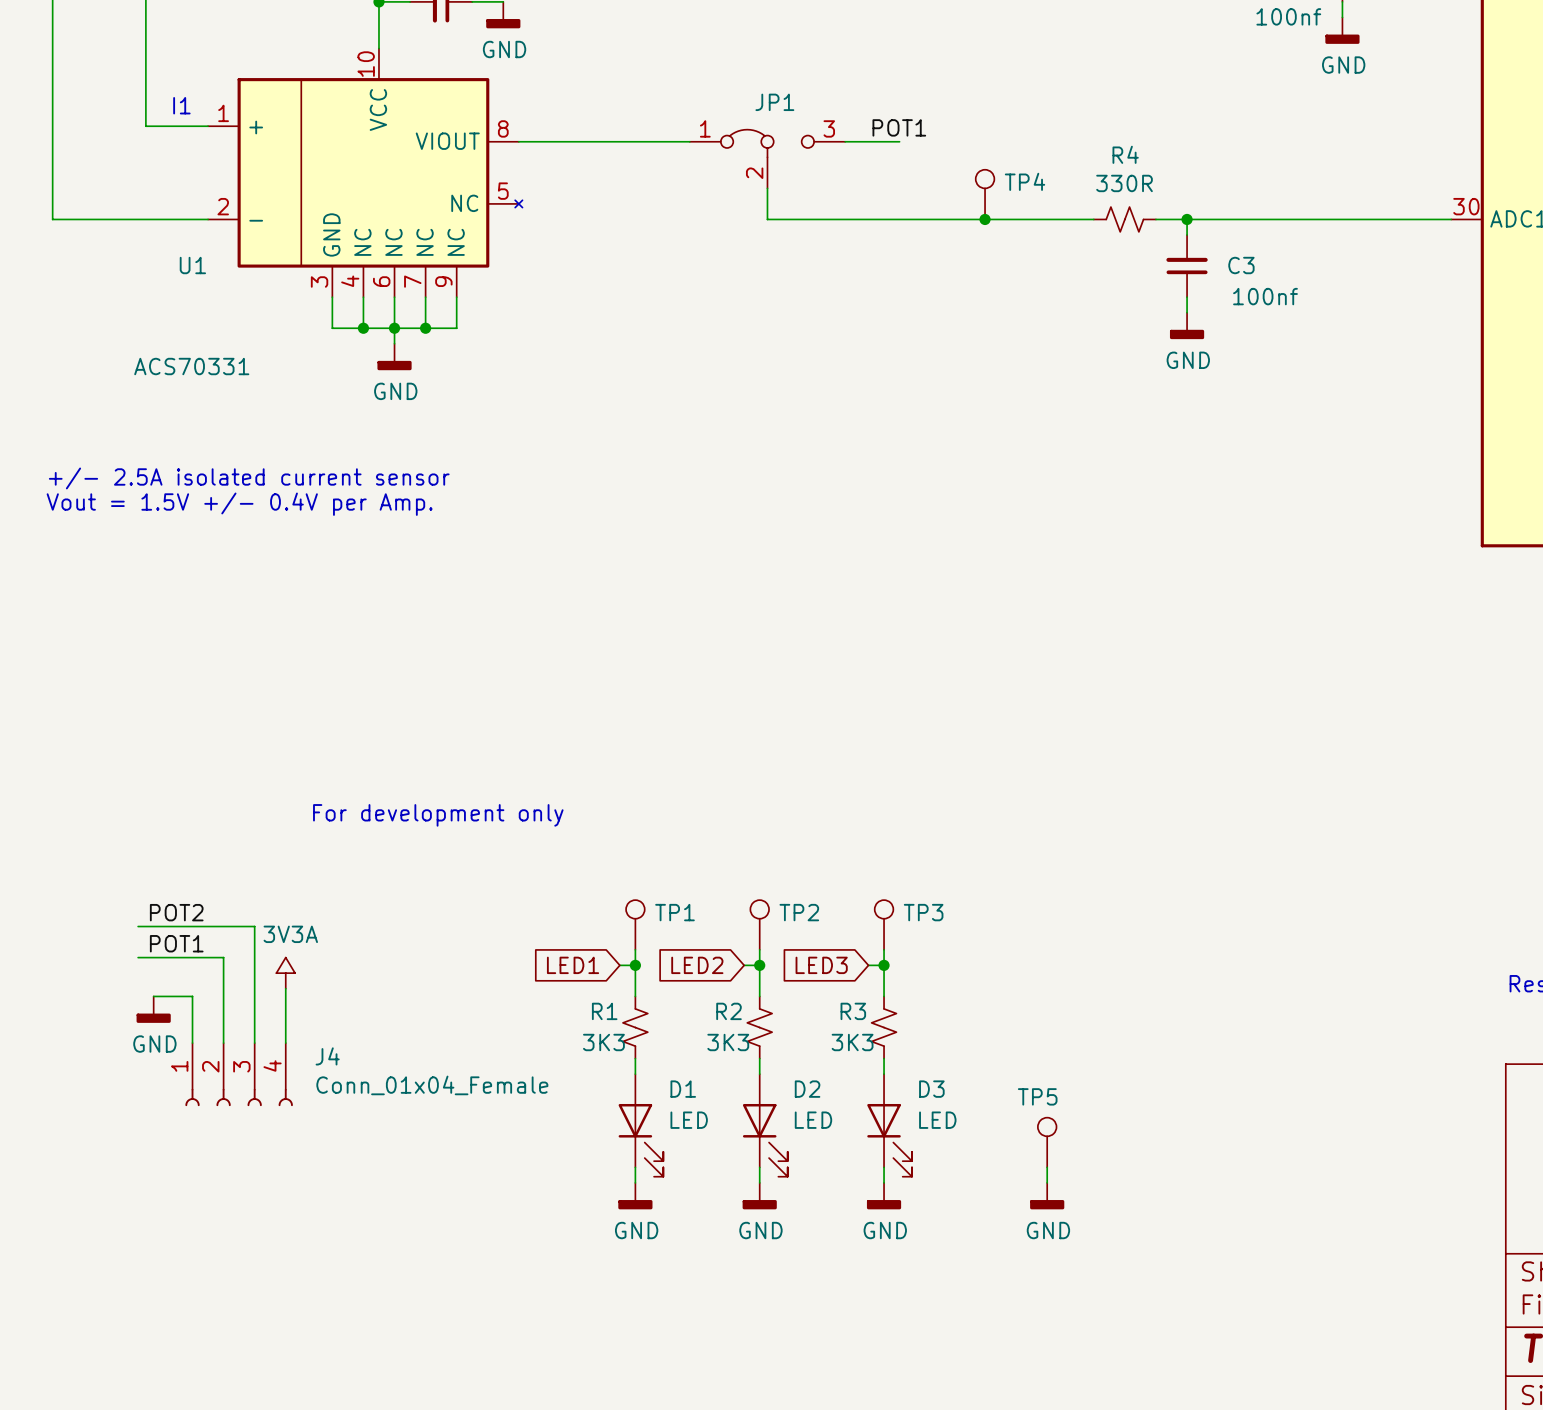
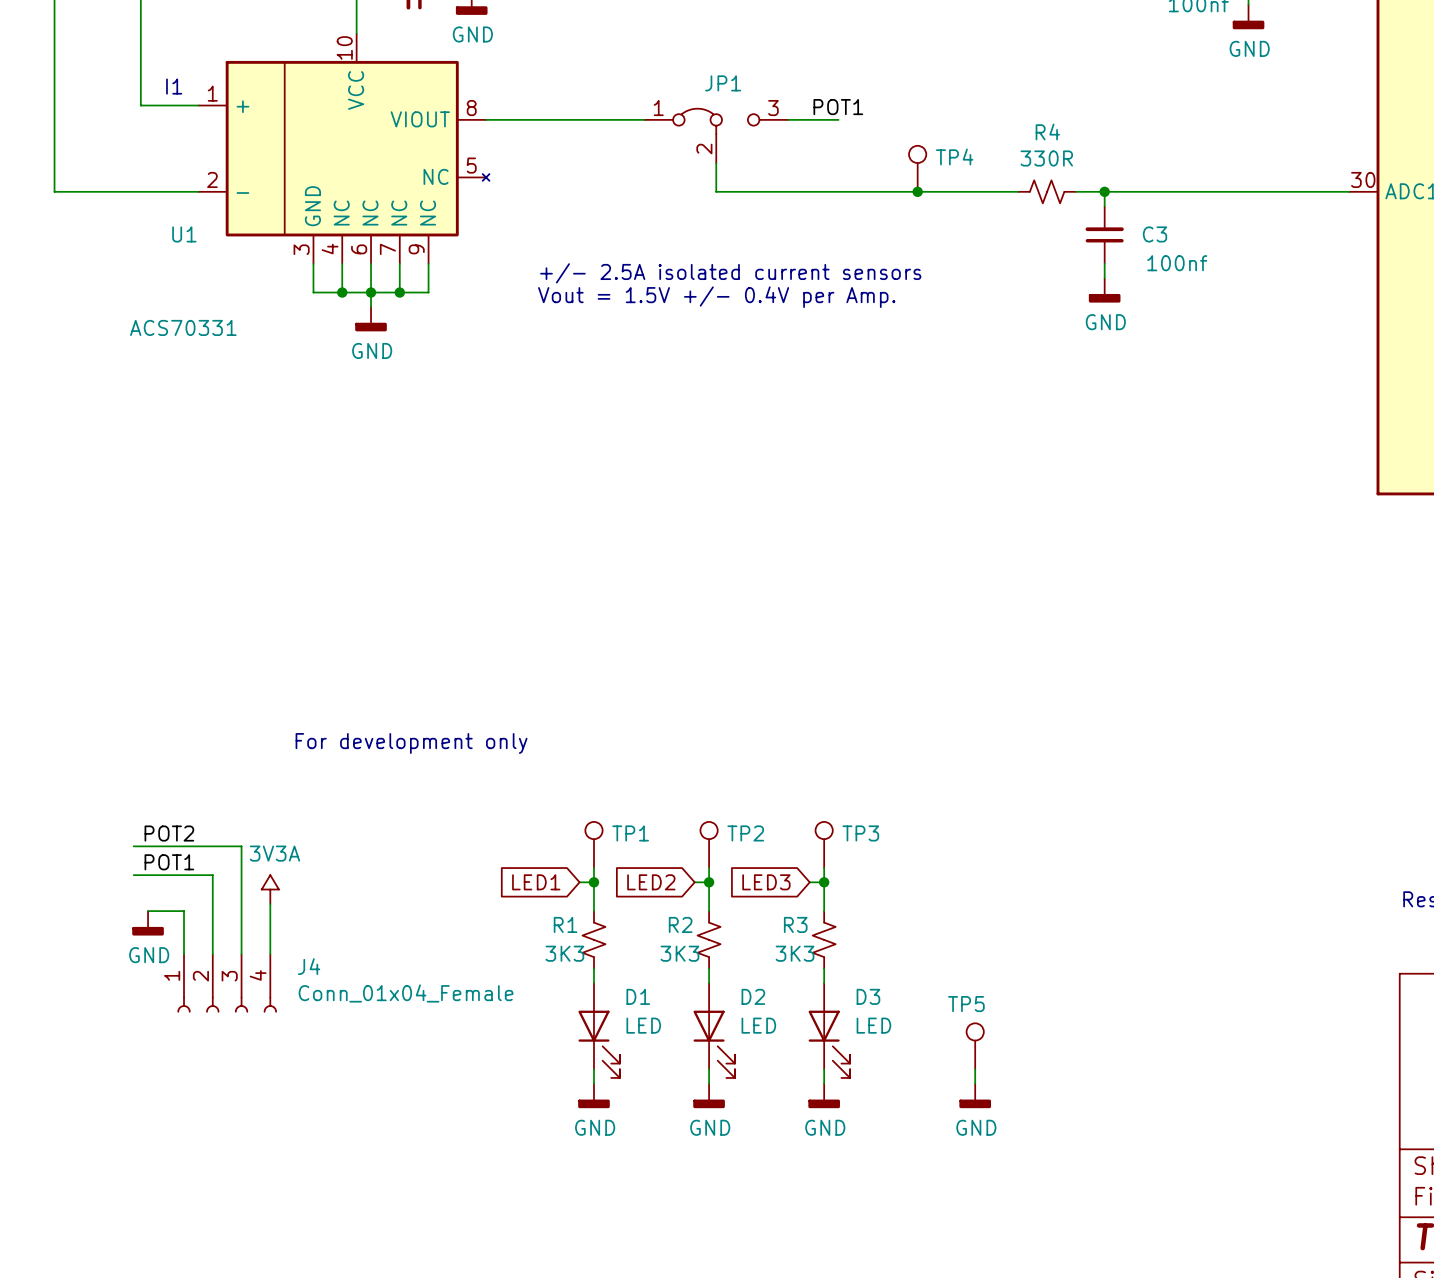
text: none -> +/- 2.5A isolated current sensors (730, 273)
text: none -> Vout = 1.5V +/- 0.4V per Amp. (716, 297)
text: +/- 2.5A isolated current sensor (249, 478) -> none
text: Vout = 1.5V +/- 0.4V per Amp. (239, 504) -> none

